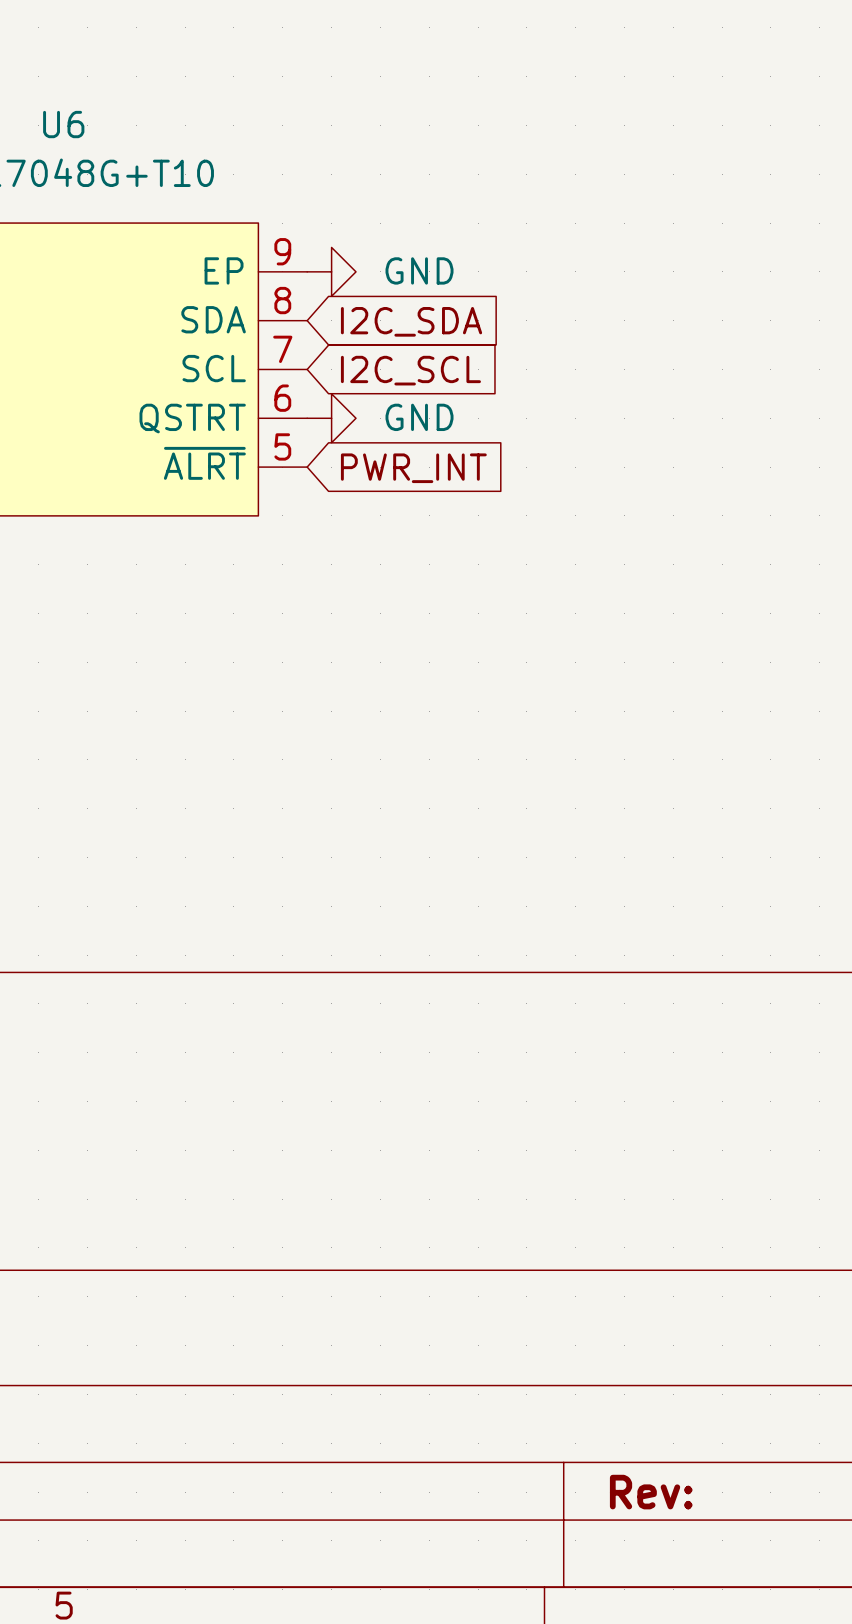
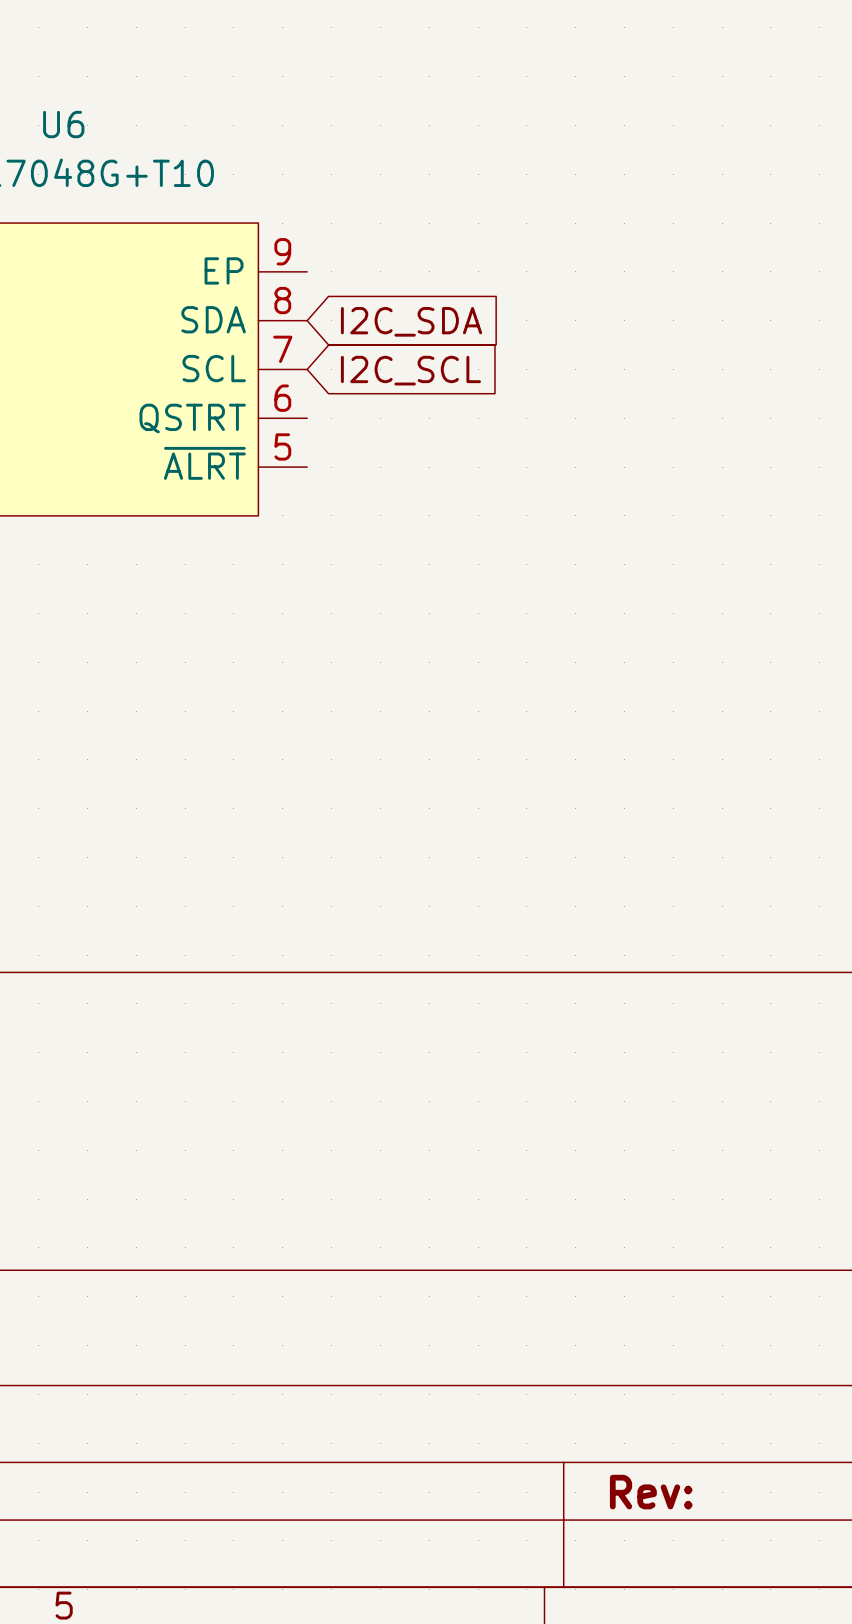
power symbol: GND (331, 271) -> none
power symbol: GND (331, 418) -> none
global label: PWR_INT (413, 468) -> none

